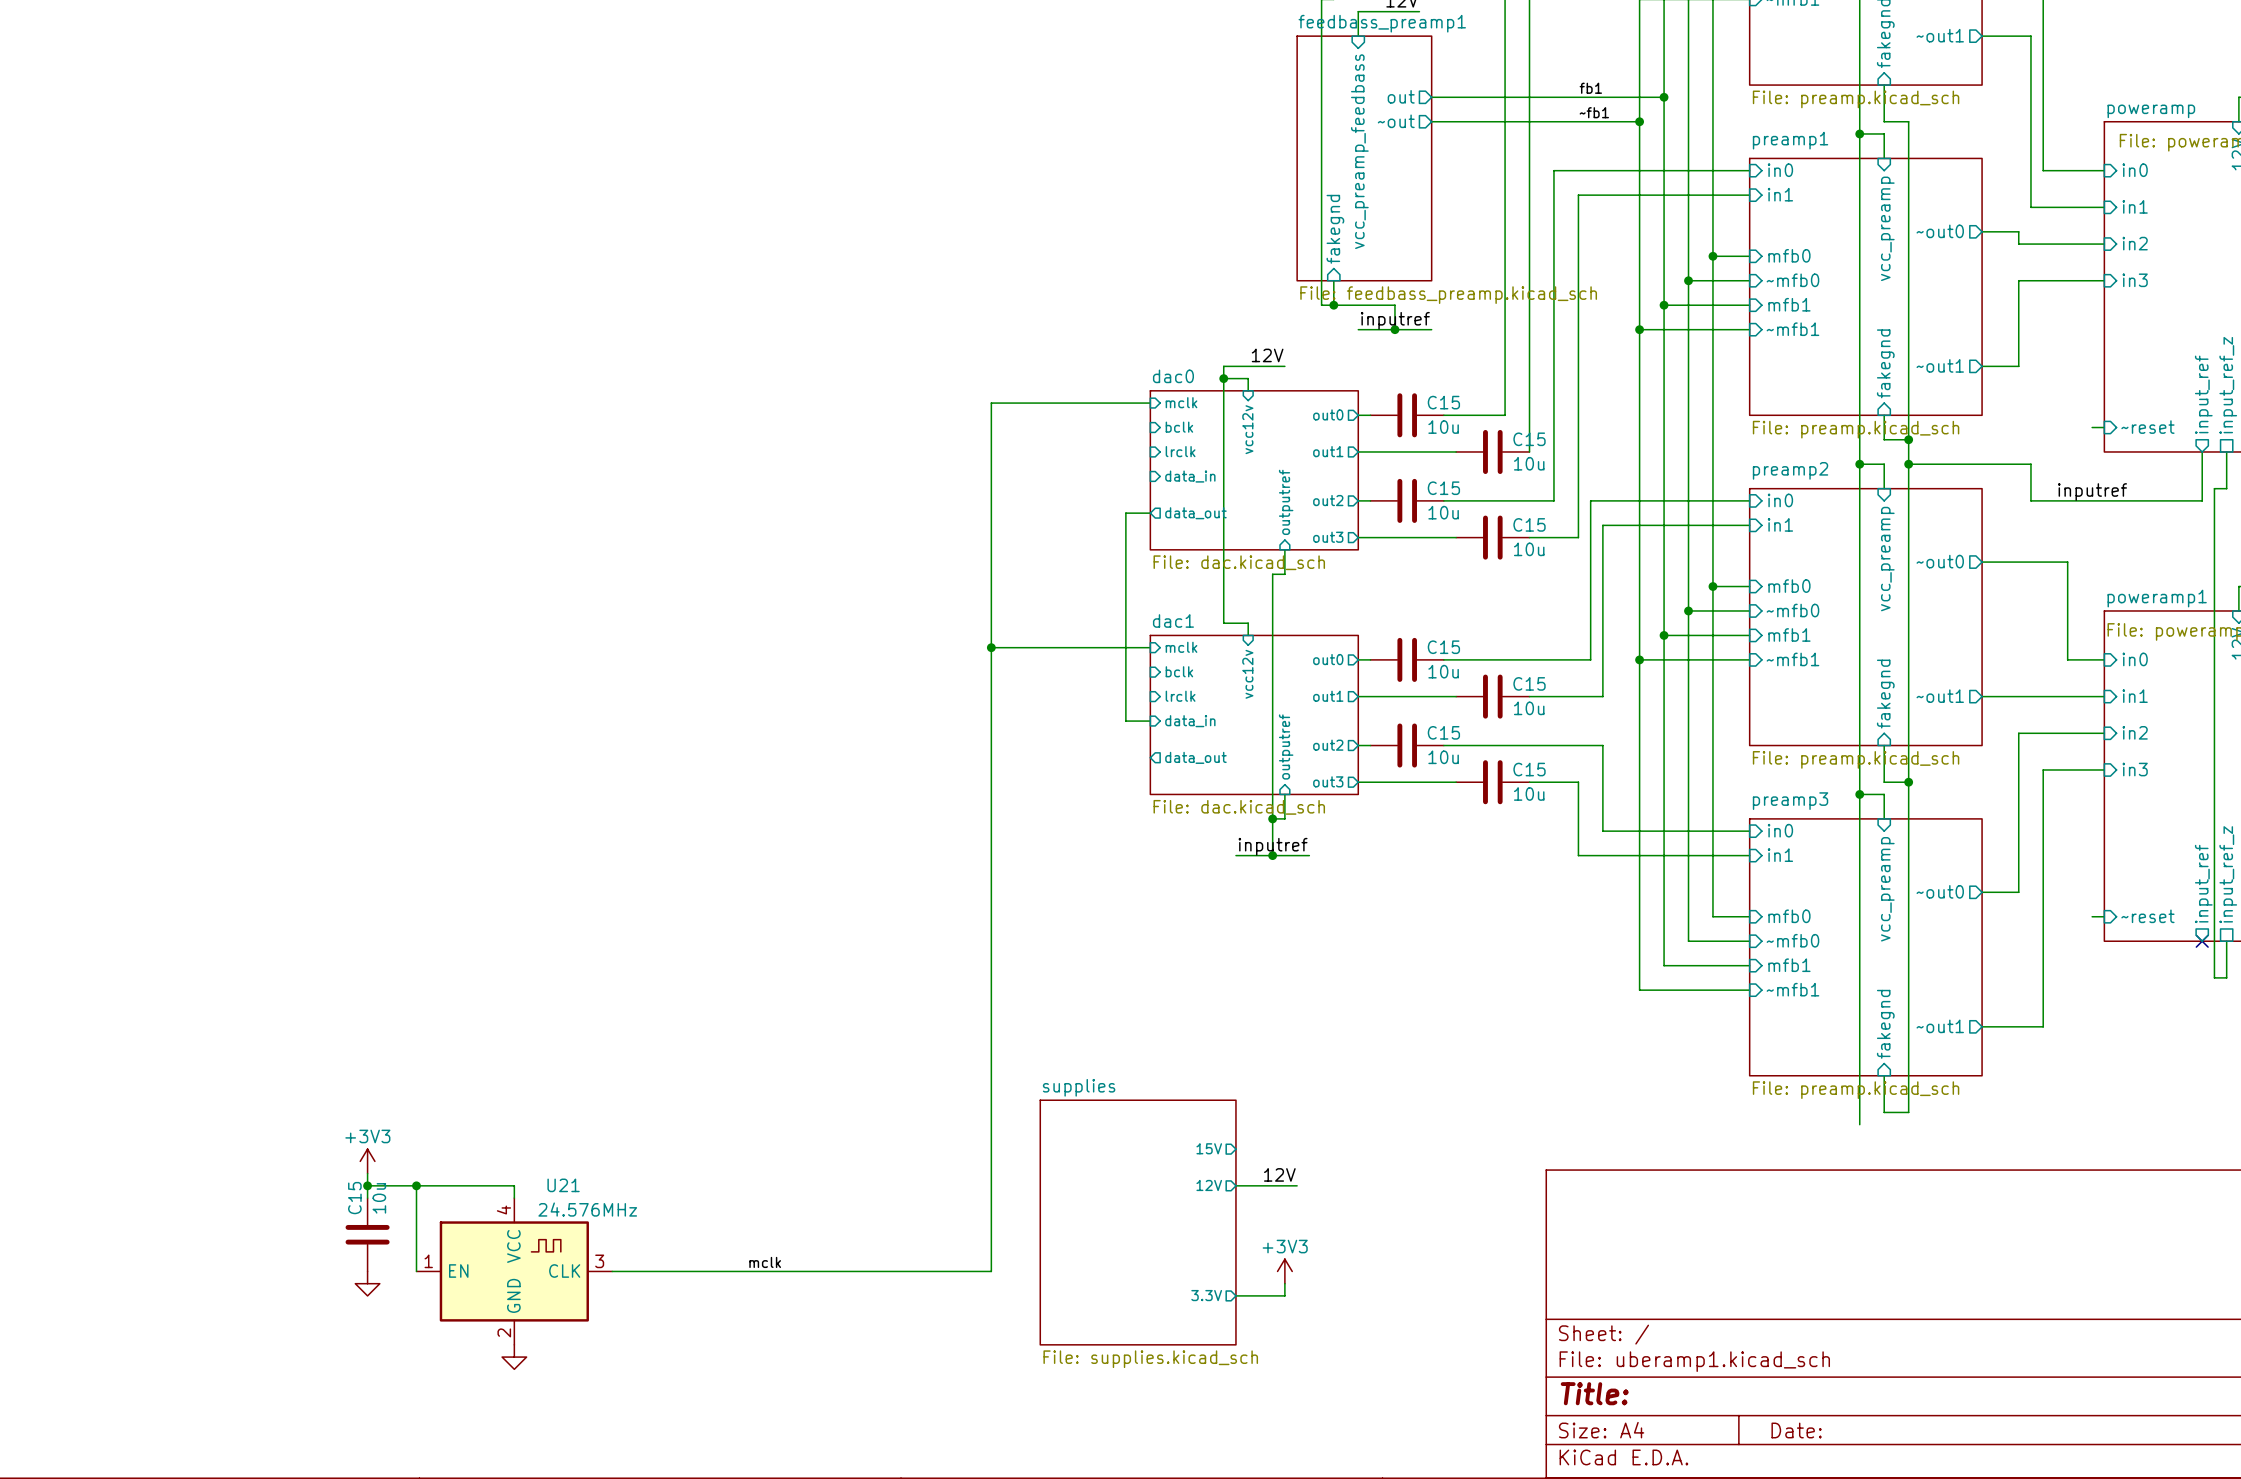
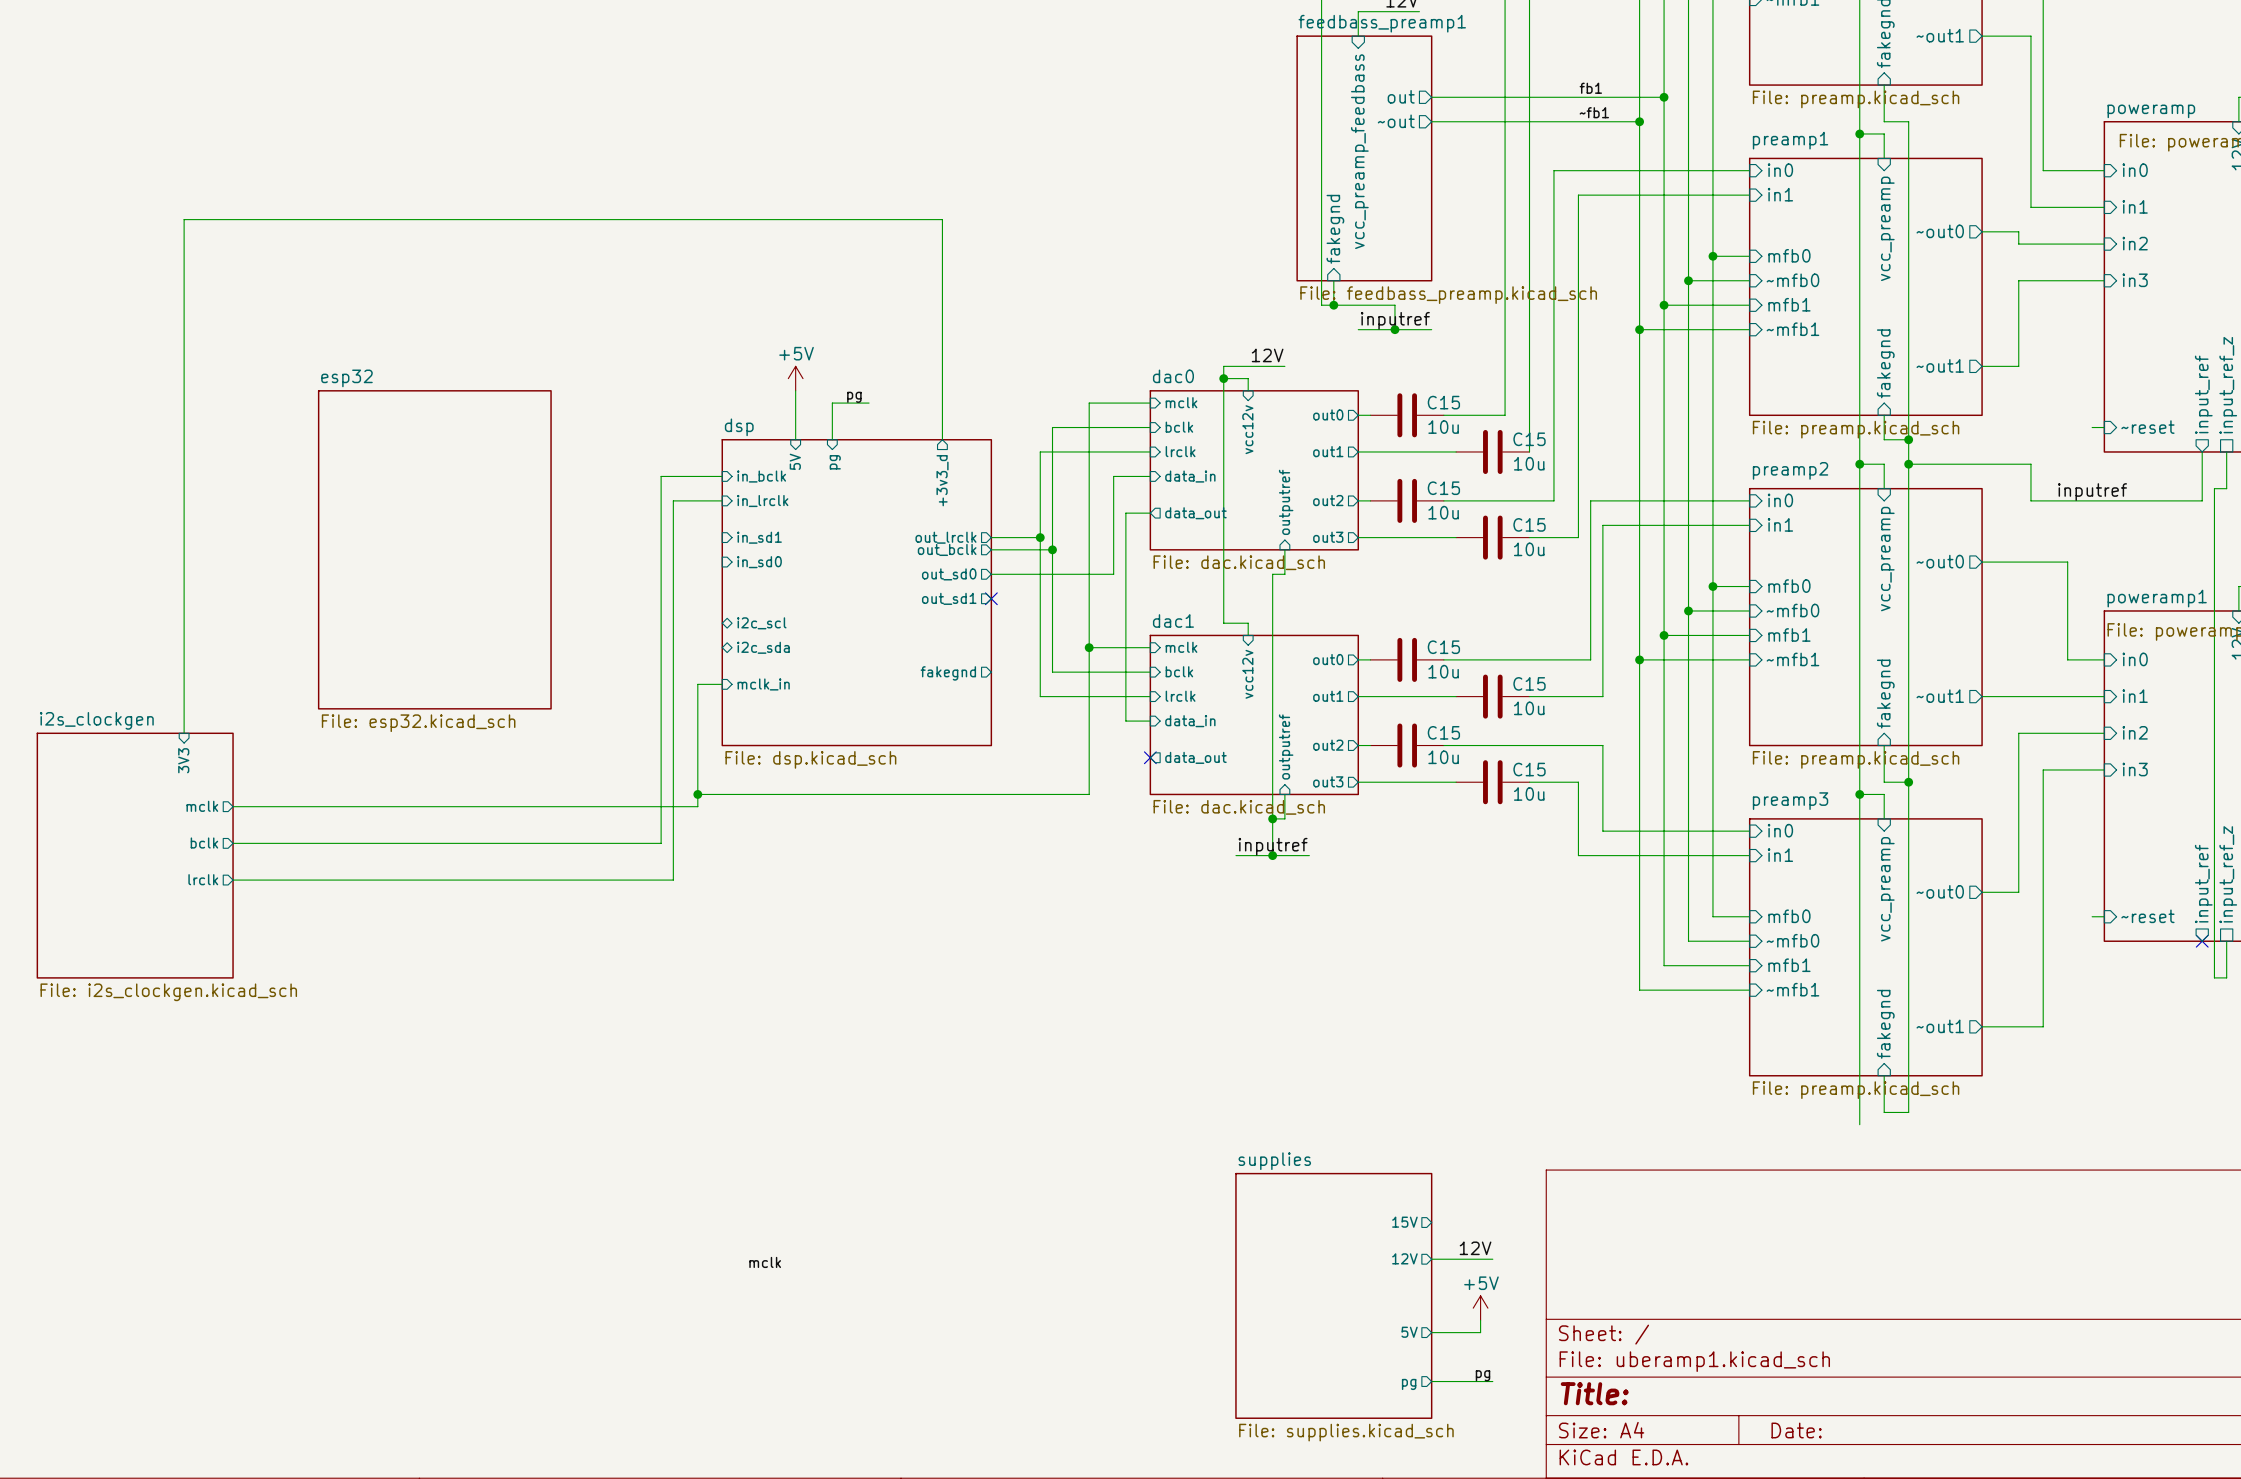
power symbol: none -> +5V (795, 378)
wire: none -> (795, 390) (795, 439)
label: none -> pg (854, 397)
wire: none -> (869, 403) (832, 403) (832, 439)
wire: (1089, 403) (991, 403) (991, 1271) (612, 1271) -> (1089, 403) (1089, 794) (697, 794)
wire: none -> (1150, 427) (1052, 427) (1052, 672) (1150, 672)
wire: none -> (942, 439) (942, 219) (184, 219) (184, 733)
wire: none -> (1150, 451) (1040, 451) (1040, 696) (1150, 696)
sheet pin: none -> 5V (795, 461)
sheet pin: none -> pg (835, 462)
wire: none -> (722, 476) (661, 476) (661, 843) (233, 843)
sheet pin: none -> in_bclk (761, 476)
wire: none -> (1150, 476) (1113, 476) (1113, 574) (991, 574)
sheet pin: none -> +3v3_d (942, 480)
wire: none -> (722, 500) (673, 500) (673, 880) (233, 880)
sheet pin: none -> in_lrclk (762, 501)
sheet pin: none -> in_sd1 (759, 537)
sheet pin: none -> out_lrclk (945, 537)
wire: none -> (991, 537) (1040, 537)
junction: none -> (1040, 537)
sheet esp32: none -> File: esp32.kicad_sch (434, 549)
sheet pin: none -> out_bclk (947, 549)
wire: none -> (991, 549) (1052, 549)
junction: none -> (1052, 549)
sheet pin: none -> in_sd0 (759, 562)
sheet pin: none -> out_sd0 (949, 574)
sheet dsp: none -> File: dsp.kicad_sch (856, 592)
sheet pin: none -> out_sd1 (949, 598)
no-connect mark: none -> (991, 598)
sheet pin: none -> i2c_scl (761, 623)
sheet pin: none -> i2c_sda (763, 647)
wire: (991, 647) (1089, 647) -> none
junction: (991, 647) -> none
junction: none -> (1089, 647)
sheet pin: none -> fakegnd (948, 673)
wire: none -> (722, 684) (697, 684) (697, 806) (233, 806)
sheet pin: none -> mclk_in (763, 684)
no-connect mark: none -> (1150, 757)
sheet pin: none -> 3V3 (183, 760)
junction: none -> (697, 794)
sheet pin: none -> mclk (202, 806)
sheet pin: none -> bclk (204, 843)
sheet i2s_clockgen: none -> File: i2s_clockgen.kicad_sch (135, 855)
sheet pin: none -> lrclk (203, 879)
sheet pin position: 15V (1209, 1148) -> 15V (1404, 1222)
power symbol: +3V3 (367, 1161) -> none
wire: (367, 1173) (367, 1198) -> none
label position: 12V (1279, 1174) -> 12V (1475, 1248)
wire: (367, 1185) (514, 1185) (514, 1198) -> none
junction: (367, 1185) -> none
wire: (416, 1185) (416, 1271) -> none
junction: (416, 1185) -> none
sheet pin position: 12V (1209, 1185) -> 12V (1404, 1258)
wire: (1235, 1185) (1297, 1185) -> (1431, 1259) (1492, 1259)
sheet supplies position: (1138, 1222) -> (1333, 1295)
C15: 10u (367, 1234) -> none
U21: 24.576MHz (514, 1271) -> none
power symbol: +3V3 (1284, 1271) -> none
power symbol: (367, 1283) -> none
wire: (1284, 1283) (1284, 1295) (1235, 1295) -> (1480, 1320) (1480, 1332) (1431, 1332)
sheet pin: 3.3V (1206, 1295) -> none
power symbol: none -> +5V (1480, 1308)
sheet pin: none -> 5V (1409, 1332)
power symbol: (514, 1357) -> none
label: none -> pg (1483, 1375)
wire: none -> (1431, 1381) (1492, 1381)
sheet pin: none -> pg (1409, 1384)

